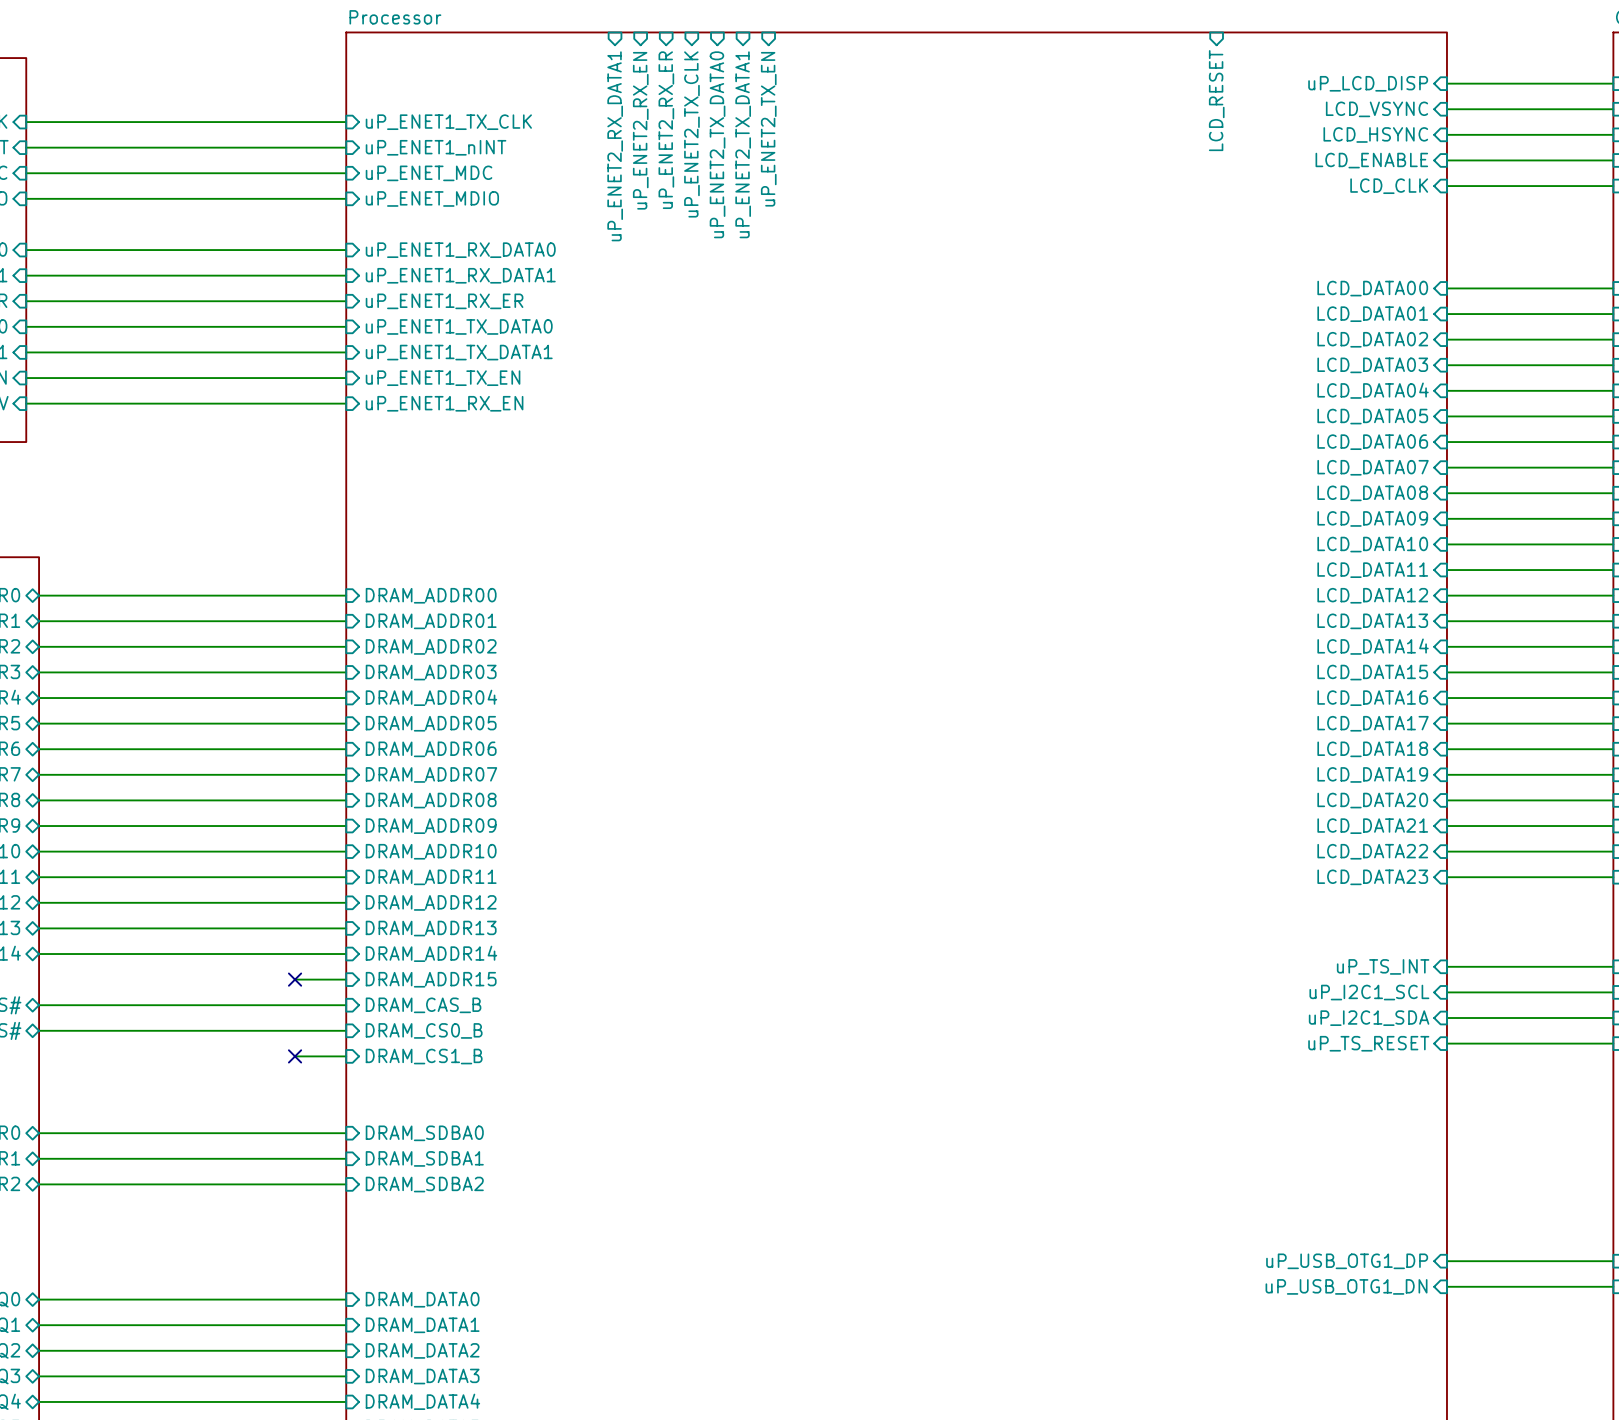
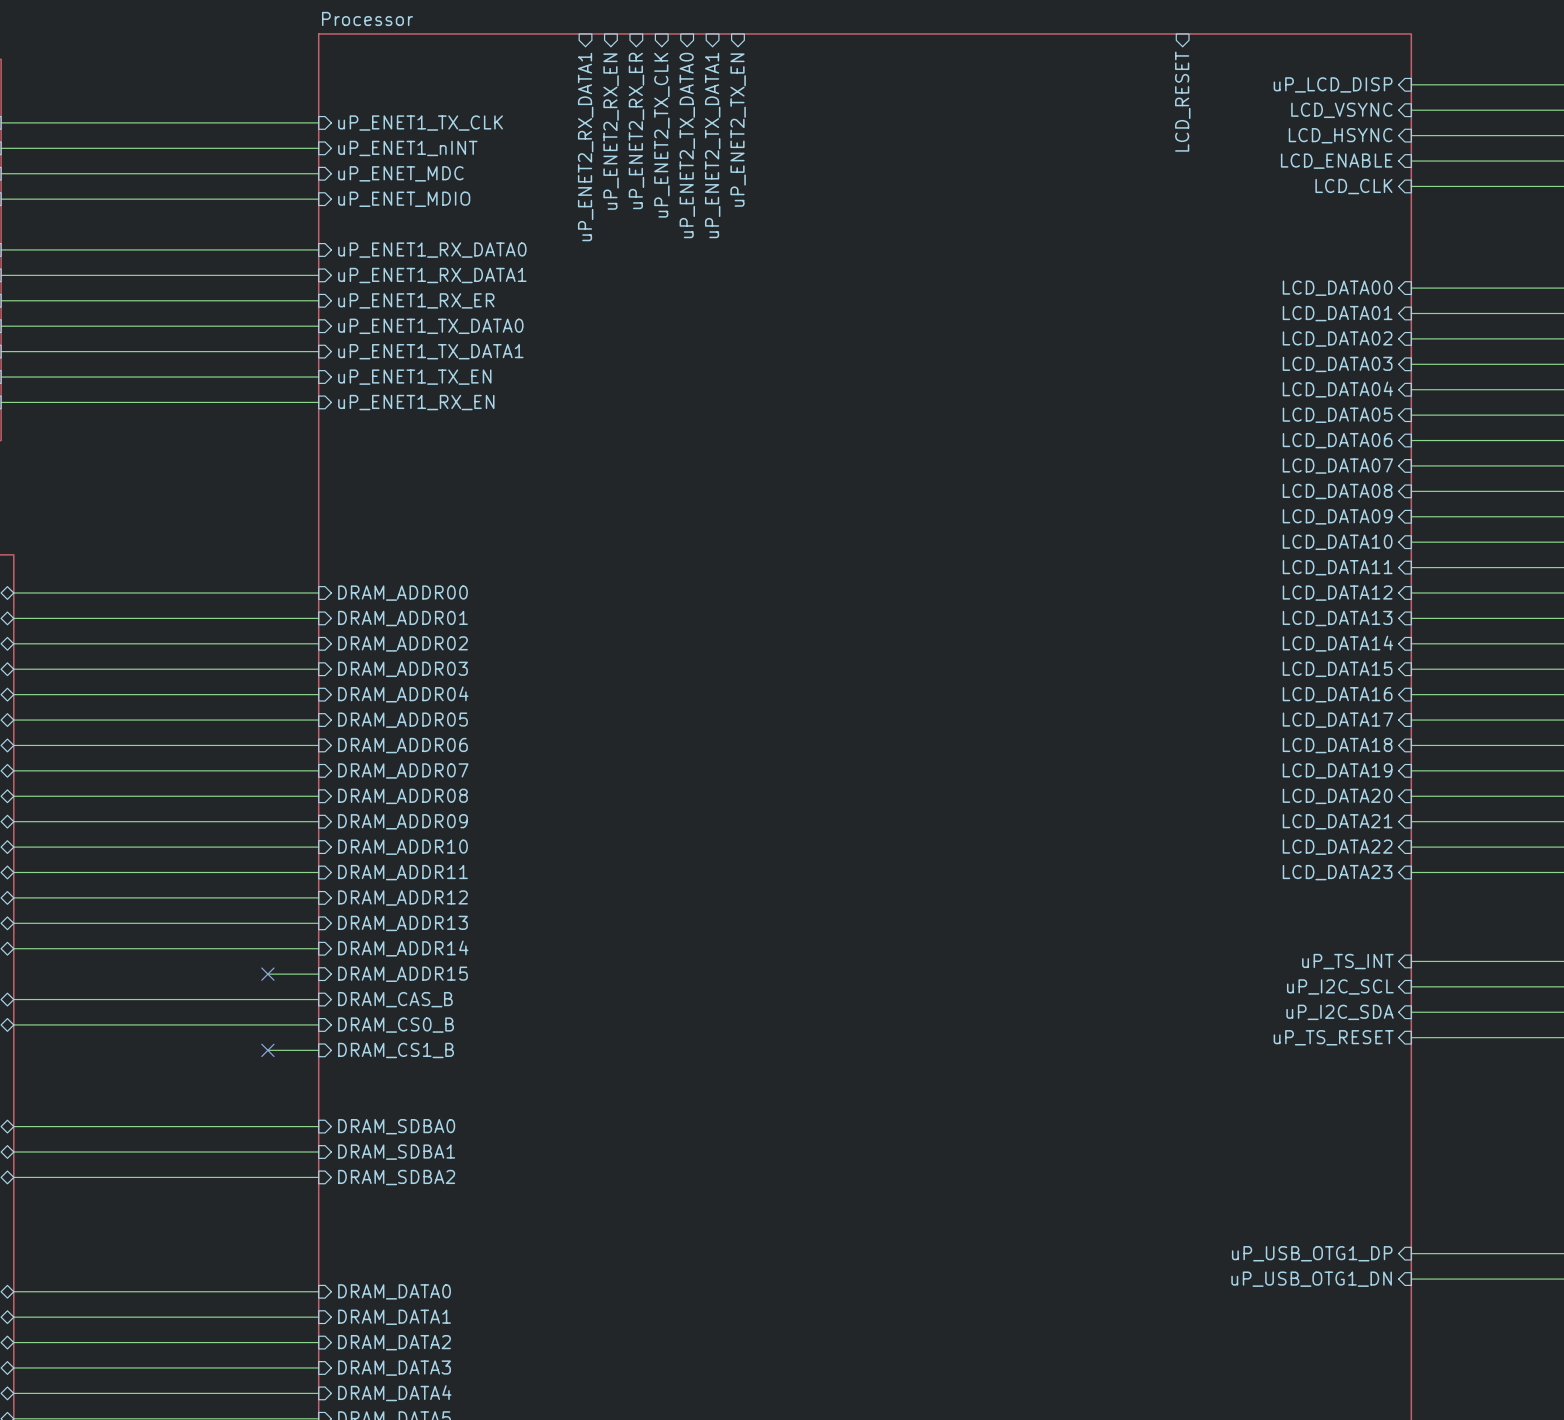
sheet pin: uP_I2C1_SCL (1369, 992) -> uP_I2C_SCL (1340, 986)
sheet pin: uP_I2C1_SDA (1369, 1018) -> uP_I2C_SDA (1340, 1012)

